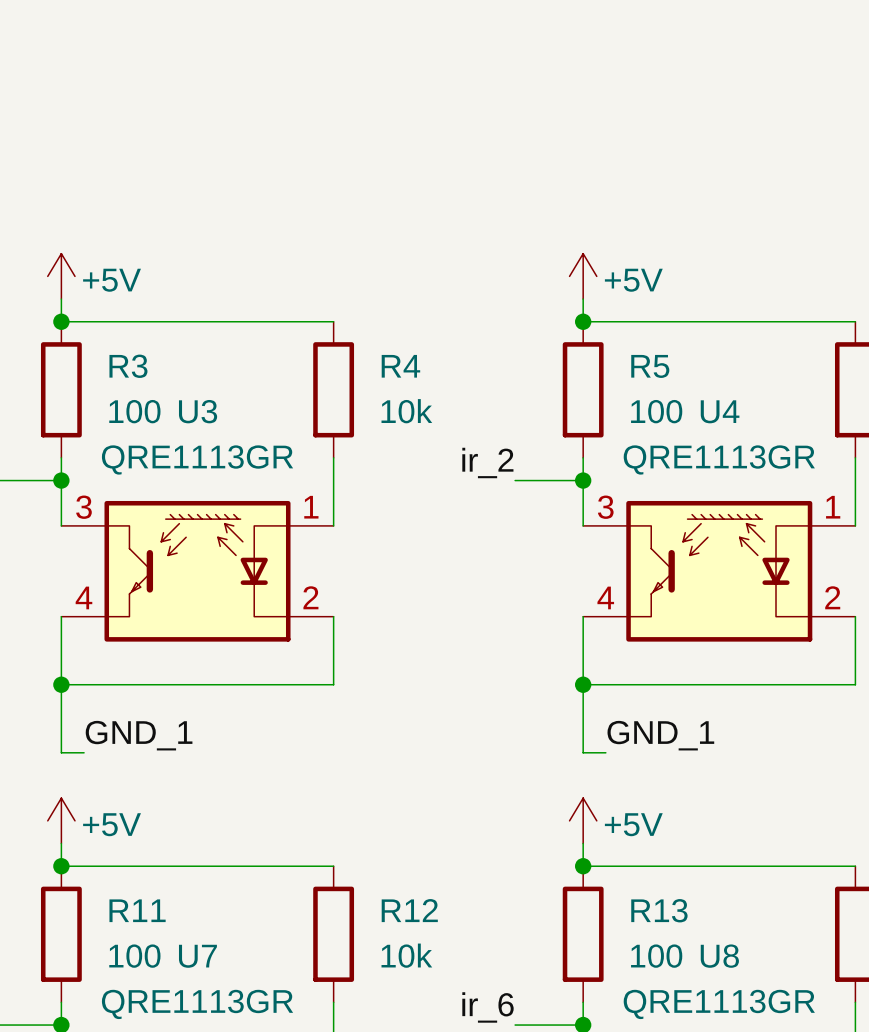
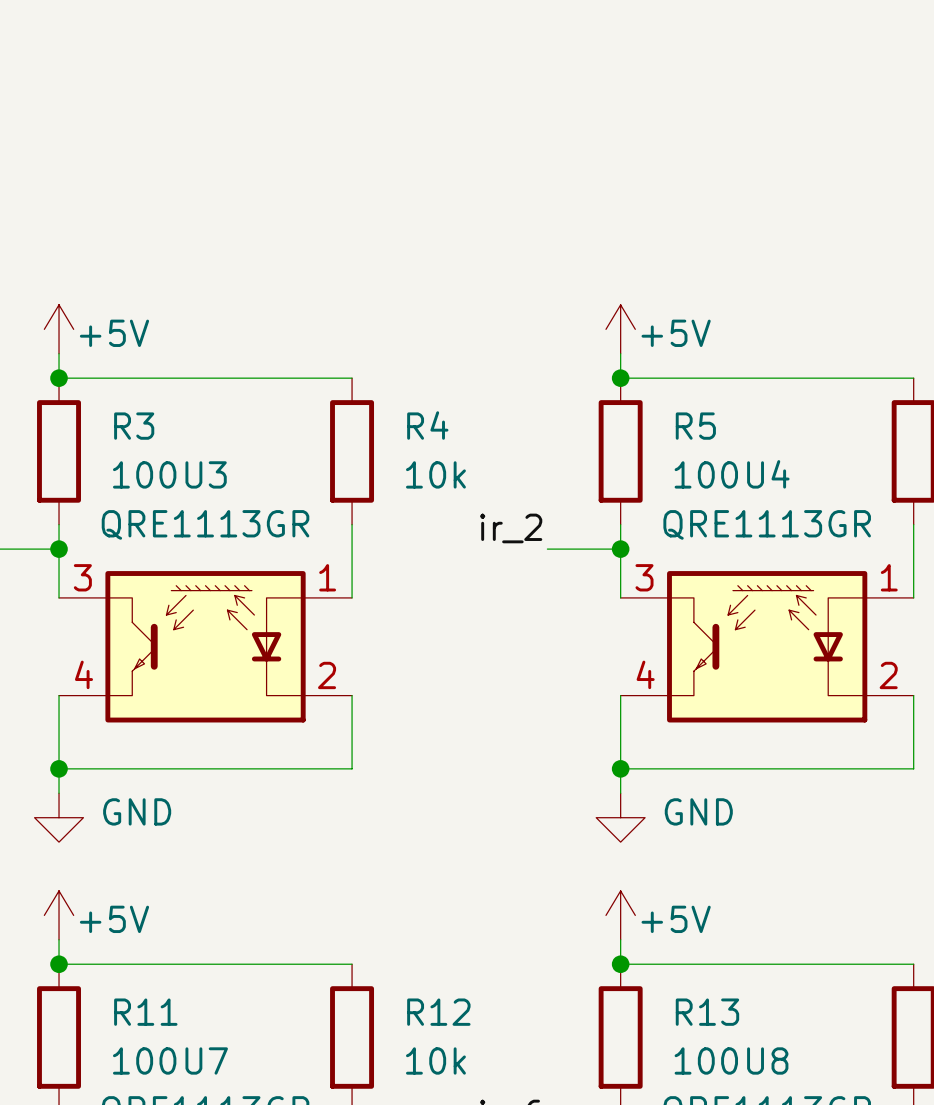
wire: (61, 707) (61, 752) (84, 752) -> none
wire: (583, 707) (583, 752) (605, 752) -> none
power symbol: none -> GND (59, 817)
power symbol: none -> GND (620, 817)
label: GND_1 (139, 735) -> none
label: GND_1 (660, 735) -> none

